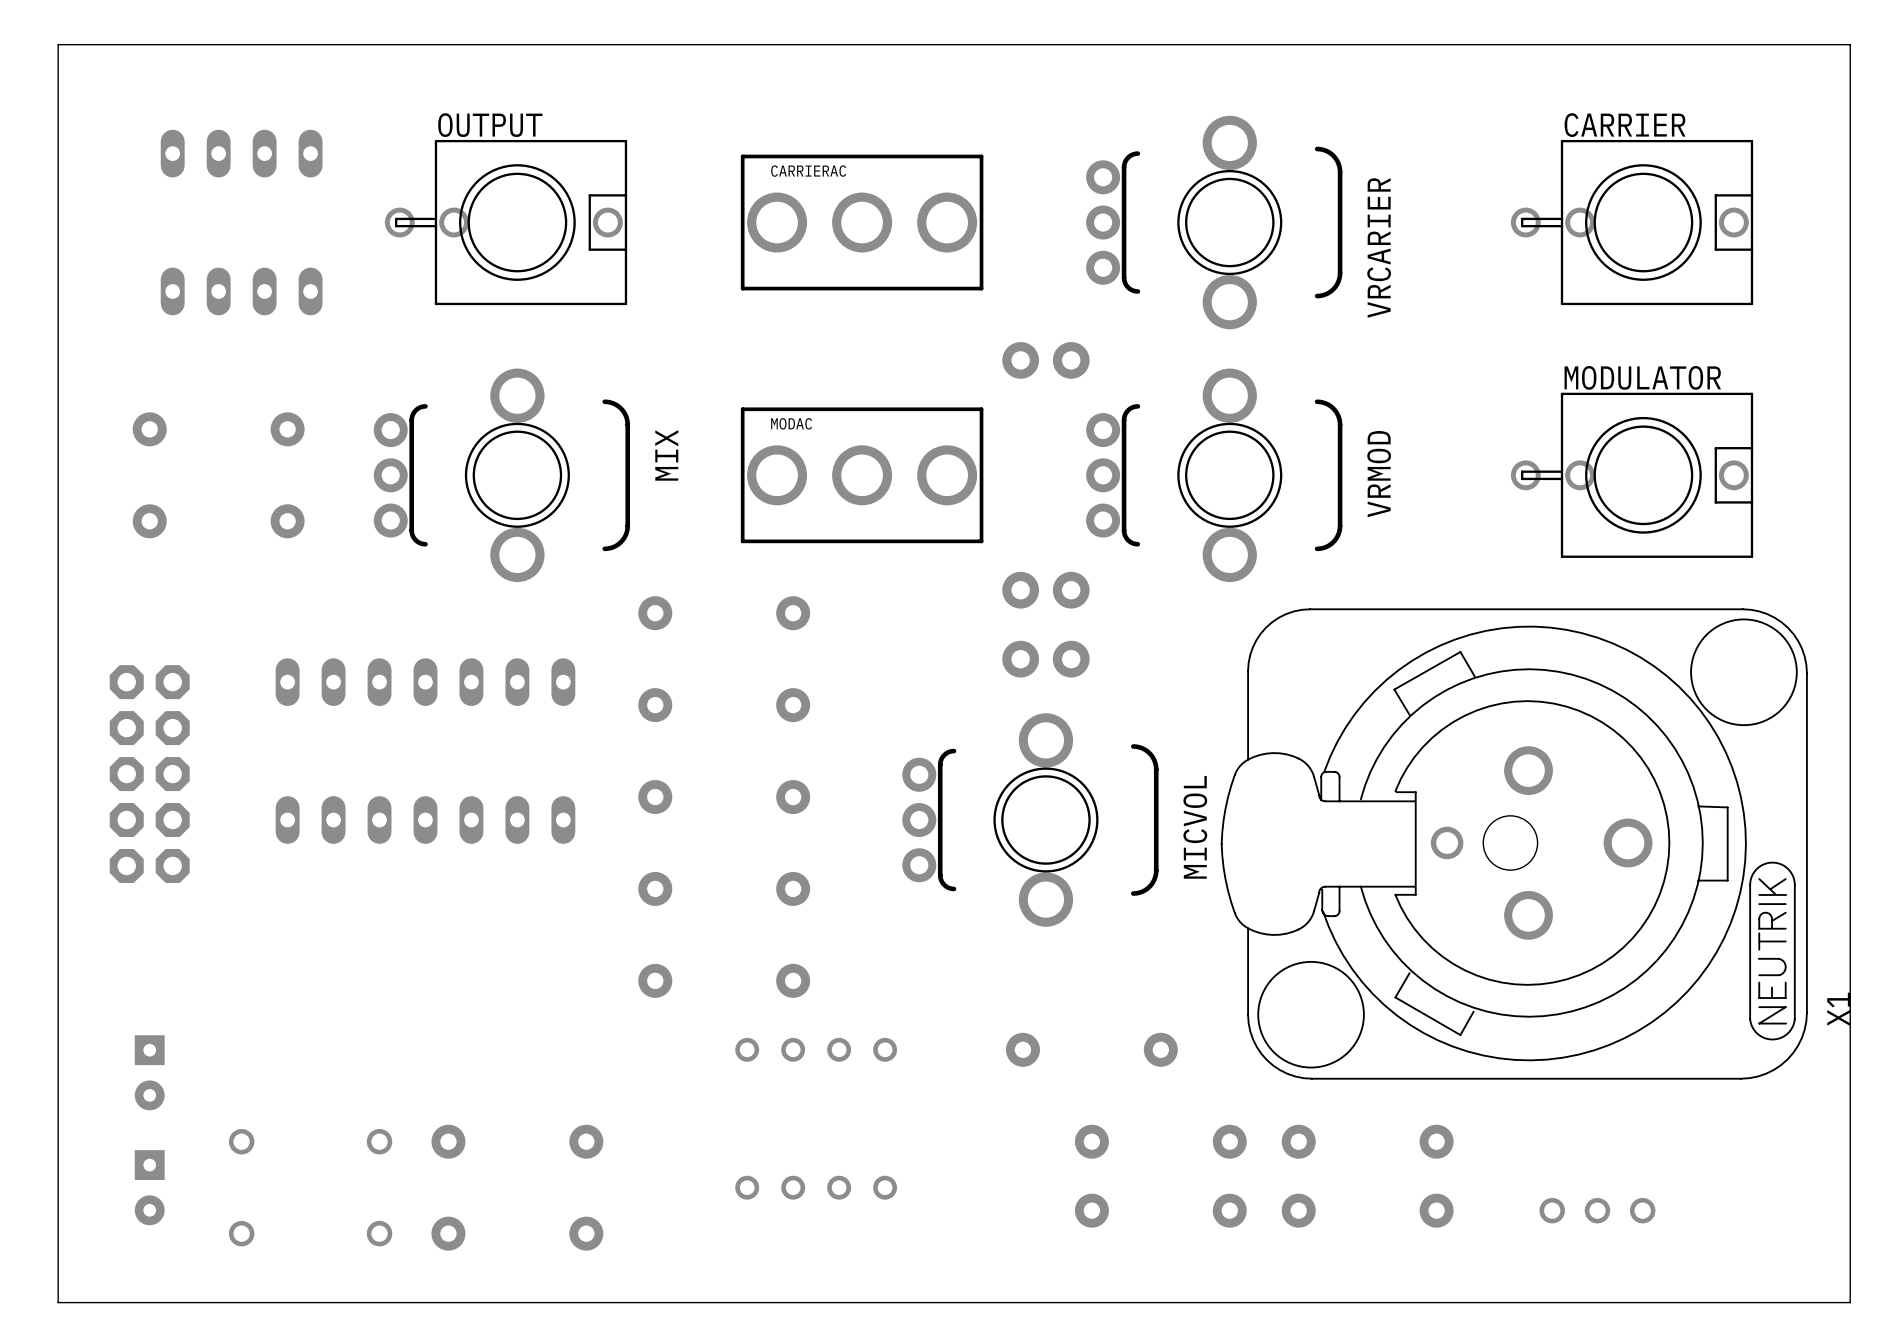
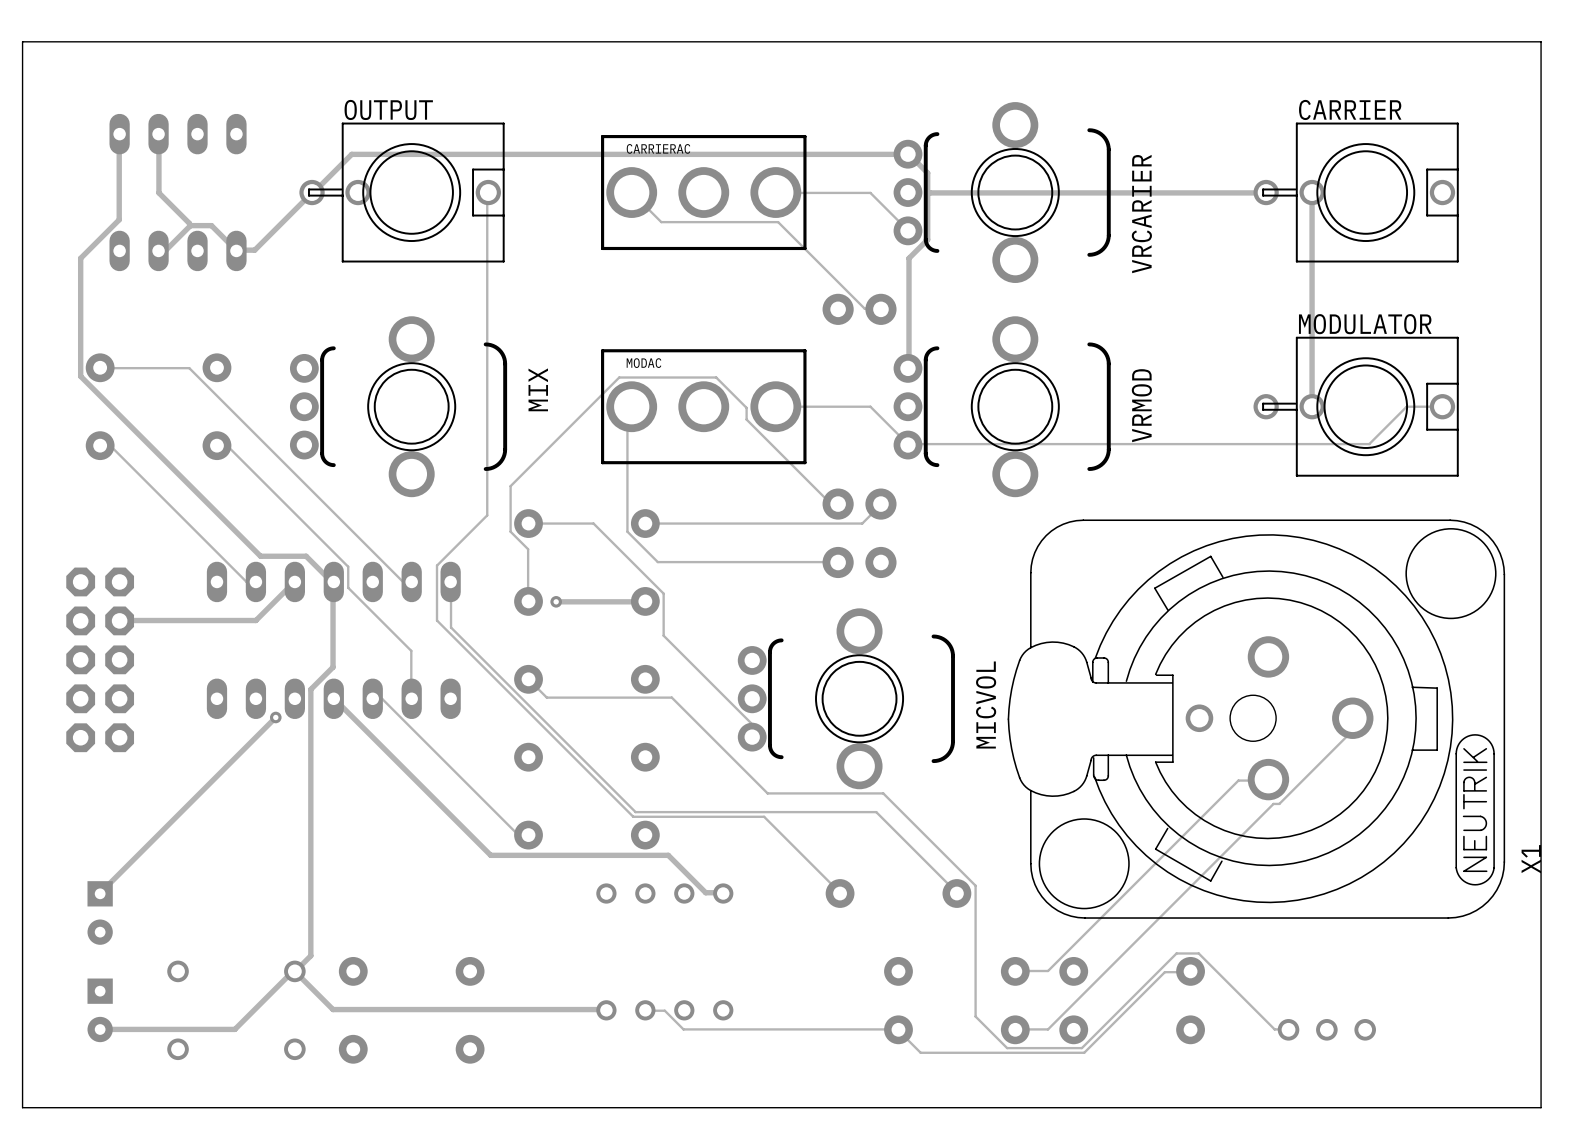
track: none -> (119, 134) (119, 219) (80, 258) (80, 376) (260, 556) (306, 556) (333, 581) (333, 667) (310, 689) (310, 955) (294, 971)
track: none -> (158, 134) (158, 192) (190, 225)
track: none -> (488, 192) (487, 515) (437, 565) (437, 620) (633, 816) (764, 816) (840, 893)
track: none -> (631, 192) (661, 222) (778, 222) (864, 308) (880, 309)
track: none -> (775, 192) (870, 192) (907, 230)
track: none -> (1266, 192) (927, 192)
track: none -> (1312, 192) (1312, 406)
track: none -> (190, 225) (165, 250) (158, 250)
track: none -> (190, 225) (211, 225) (236, 250) (254, 250) (351, 154) (909, 154) (927, 173) (927, 239) (909, 258) (907, 368)
track: none -> (100, 367) (189, 368) (403, 581) (411, 581)
track: none -> (631, 406) (627, 410) (627, 531) (657, 562) (838, 562)
track: none -> (1442, 406) (1406, 406) (1369, 444) (907, 445) (870, 406) (775, 406)
track: none -> (100, 445) (111, 446) (246, 581) (255, 581)
track: none -> (216, 445) (227, 446) (348, 566) (348, 587) (411, 650) (411, 698)
track: none -> (838, 504) (830, 503) (746, 419) (746, 407) (716, 377) (619, 377) (510, 486) (510, 531) (528, 549) (528, 601)
track: none -> (880, 504) (862, 523) (645, 523)
track: none -> (528, 523) (593, 523) (663, 593) (663, 635) (751, 723) (752, 737)
track: none -> (294, 581) (255, 620) (119, 620)
track: none -> (450, 581) (451, 627) (635, 812) (876, 812) (956, 893)
via: none -> (556, 601)
track: none -> (645, 601) (556, 601)
track: none -> (528, 679) (546, 697) (671, 697) (767, 793) (883, 793) (975, 885) (975, 1016) (1007, 1048) (1081, 1048) (1176, 953) (1198, 953) (1274, 1029) (1288, 1029)
track: none -> (333, 698) (490, 855) (668, 855) (705, 892) (723, 893)
track: none -> (372, 698) (382, 698) (517, 834) (528, 834)
track: none -> (275, 717) (100, 893)
via: none -> (275, 717)
track: none -> (1352, 718) (1351, 731) (1279, 803) (1273, 803) (1048, 1029) (1015, 1029)
track: none -> (1268, 779) (1238, 780) (1048, 971) (1015, 971)
track: none -> (294, 971) (333, 1009) (606, 1010)
track: none -> (294, 971) (234, 1029) (100, 1029)
track: none -> (1190, 971) (1164, 972) (1084, 1052) (920, 1052) (898, 1029) (683, 1029) (664, 1010) (645, 1010)

